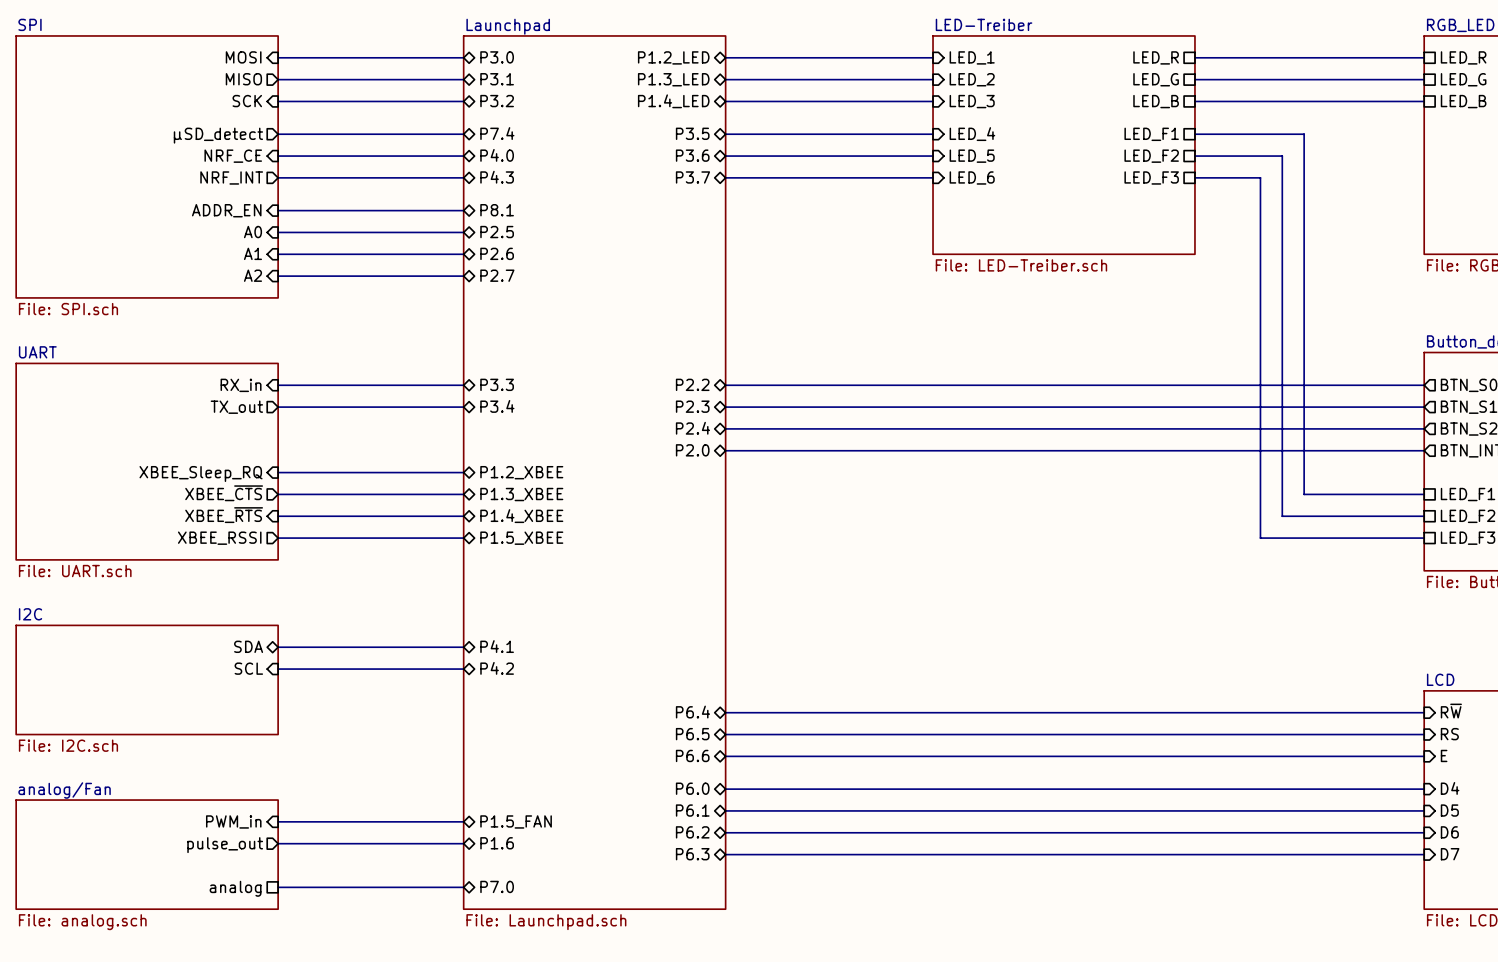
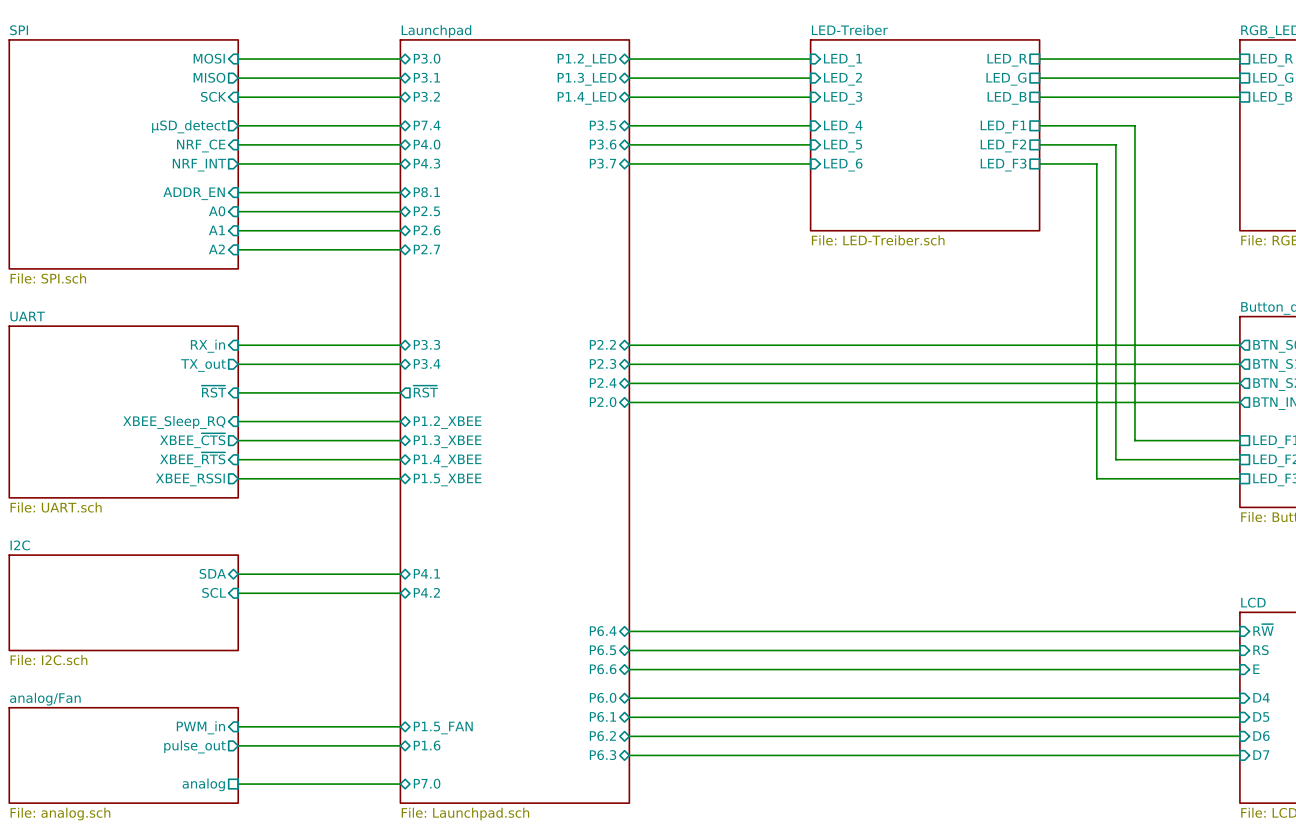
sheet pin: none -> ~{RST} (213, 391)
sheet pin: none -> ~{RST} (425, 391)
wire: none -> (238, 392) (400, 392)

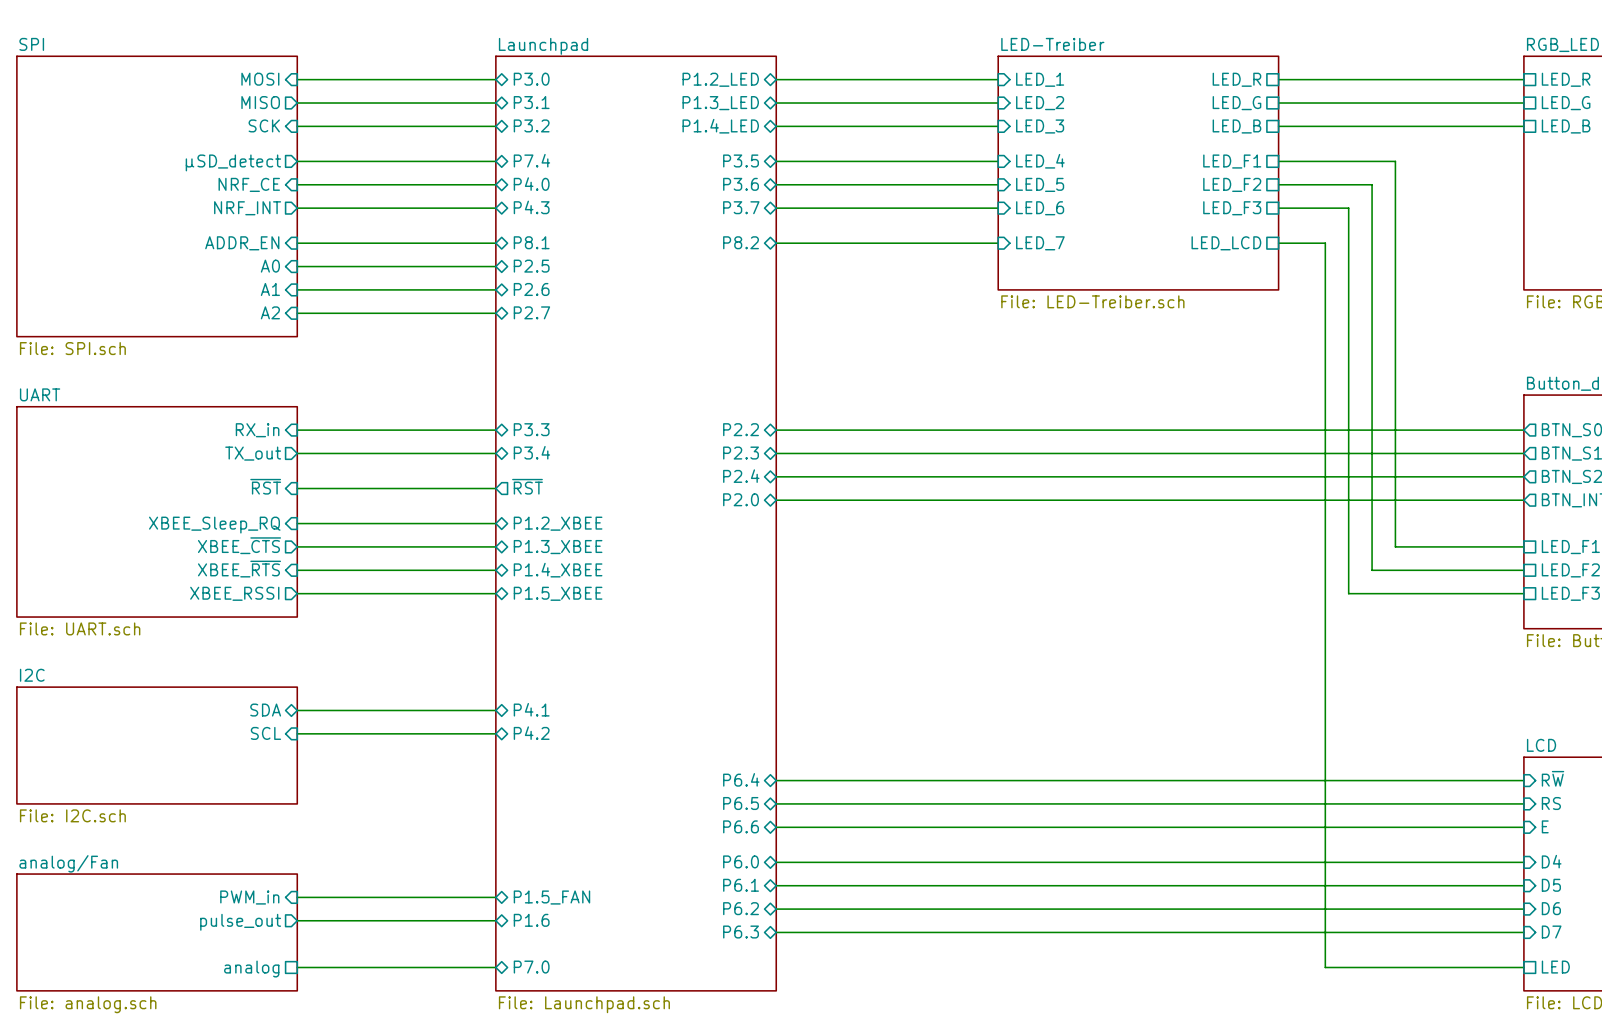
sheet pin: none -> P8.2 (741, 242)
wire: none -> (776, 243) (998, 243)
wire: none -> (1278, 243) (1325, 243) (1325, 967) (1523, 967)
sheet pin: none -> LED_7 (1040, 243)
sheet pin: none -> LED_LCD (1226, 243)
sheet pin: none -> LED (1555, 967)

